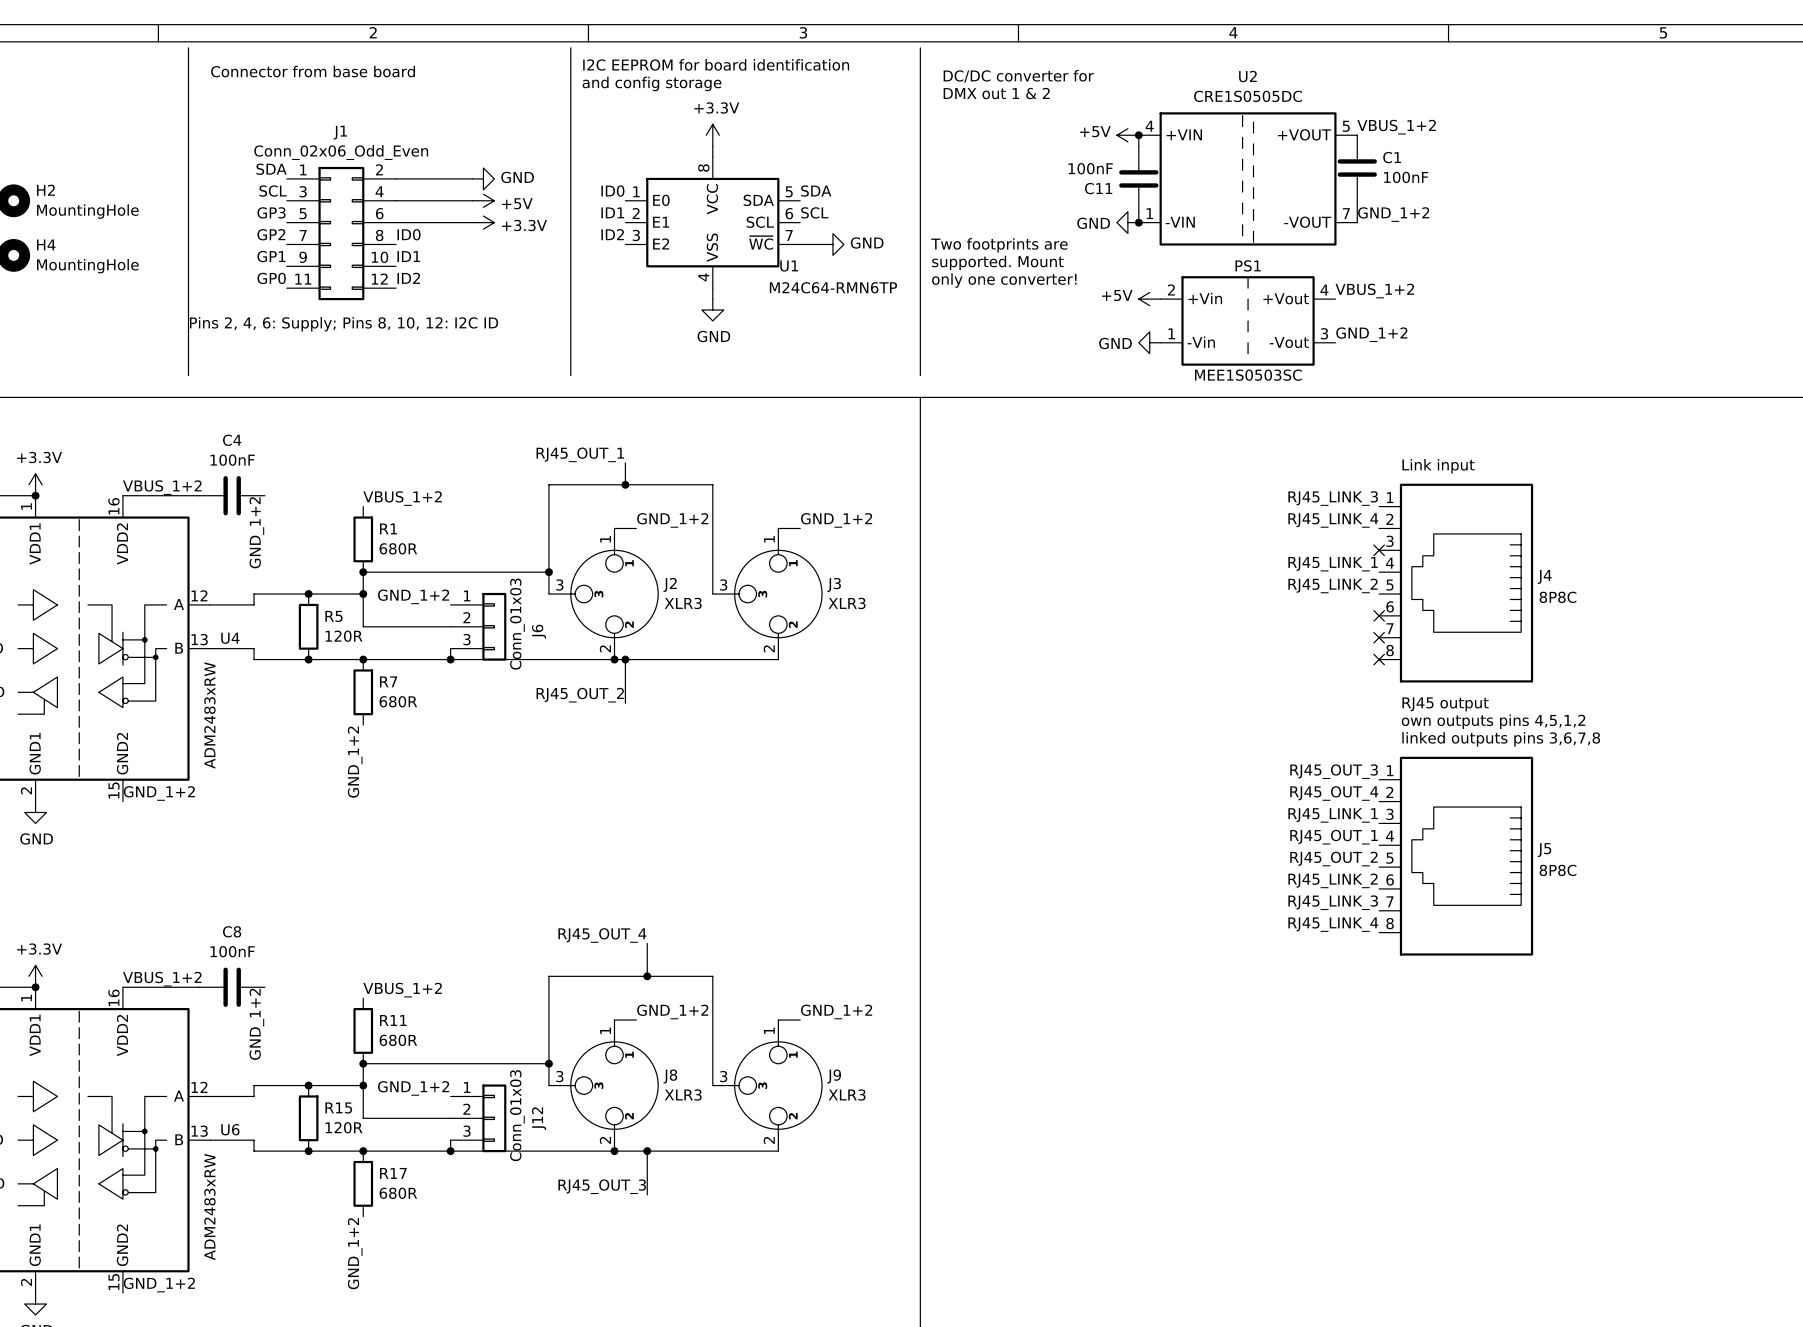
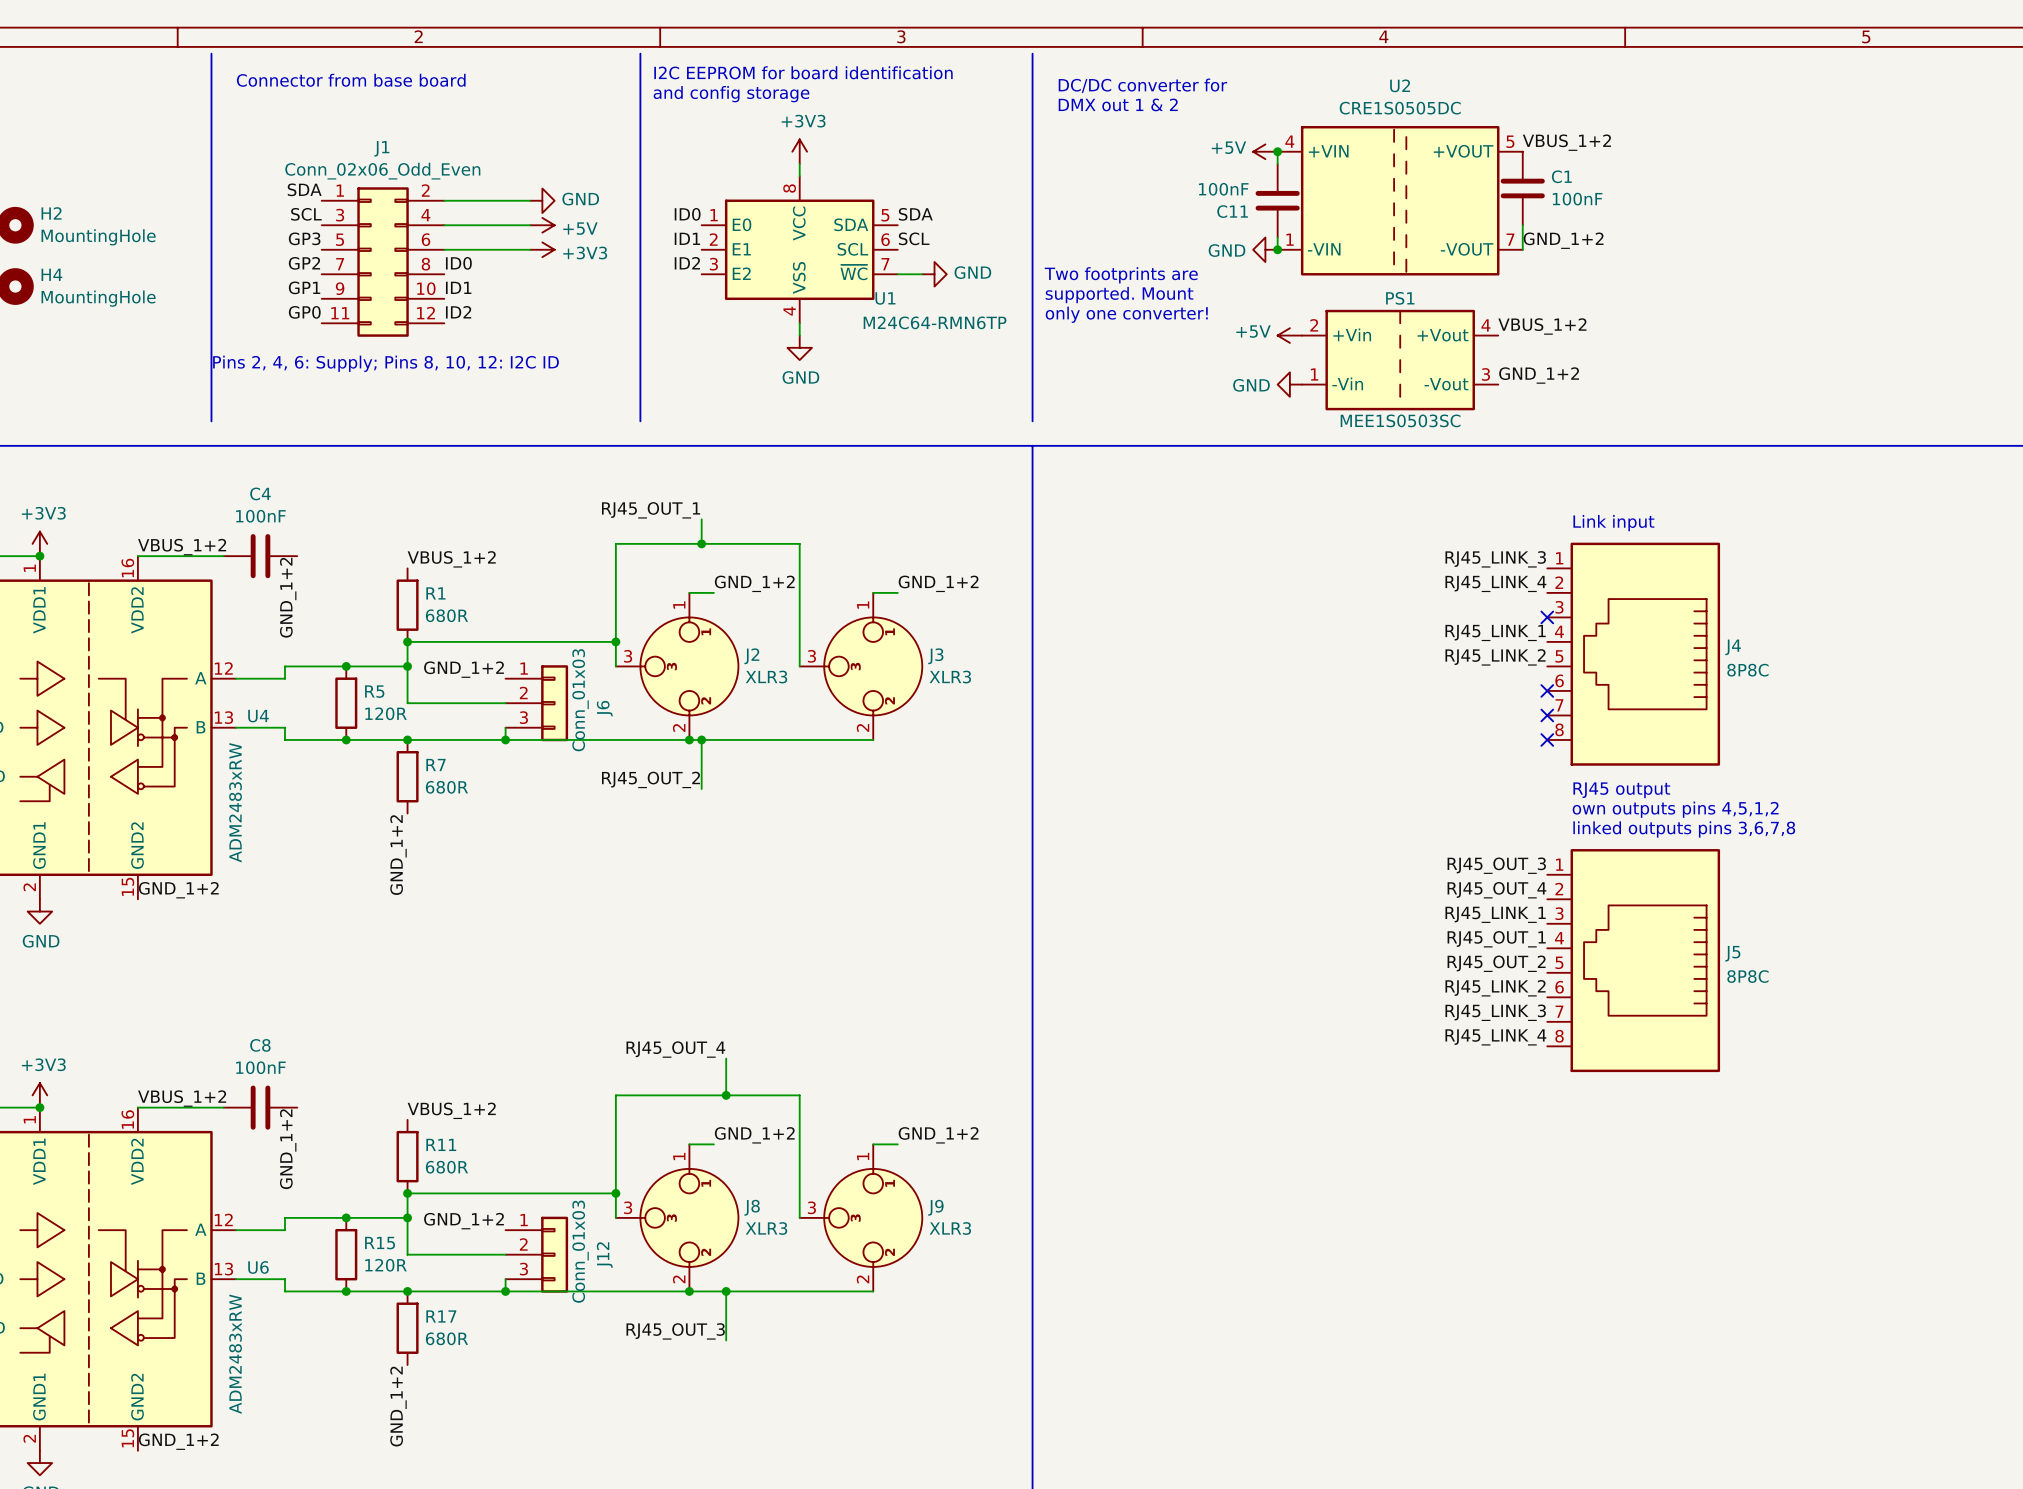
power symbol: +3.3V (712, 135) -> +3V3 (799, 151)
power symbol: +3.3V (483, 222) -> +3V3 (542, 249)
power symbol: +3.3V (35, 484) -> +3V3 (39, 543)
power symbol: +3.3V (35, 976) -> +3V3 (39, 1095)

